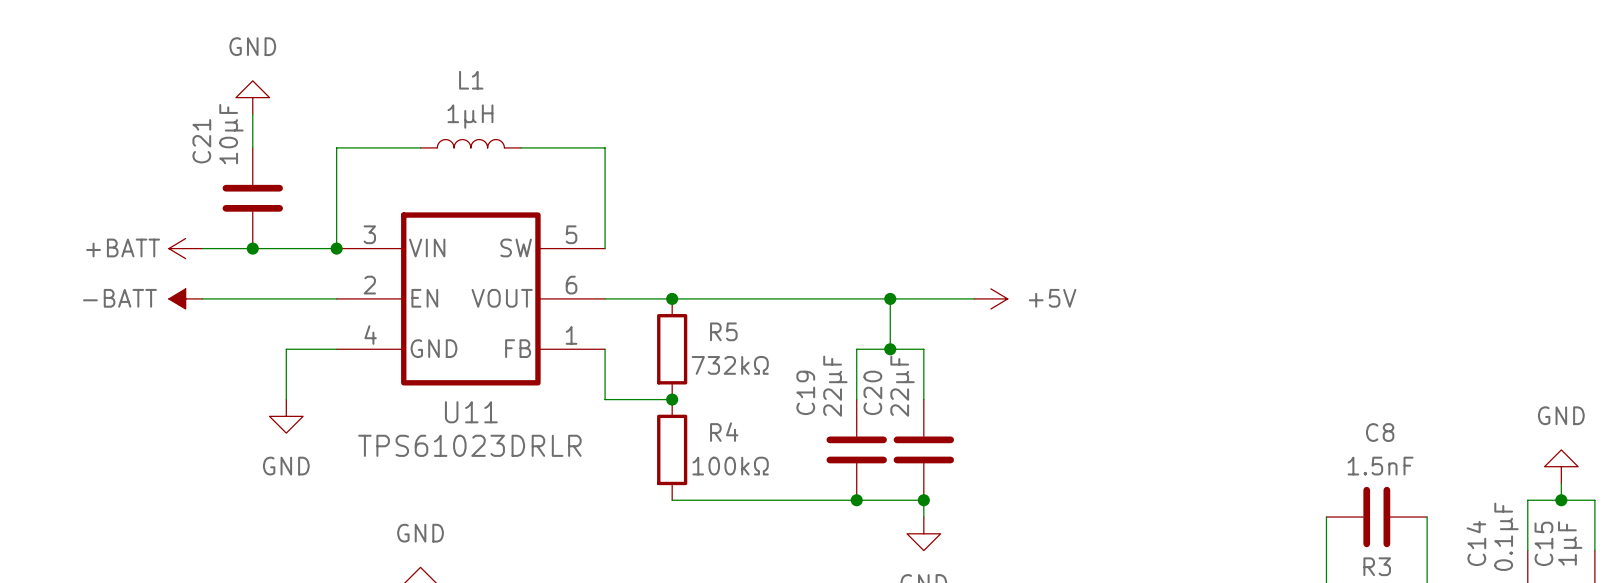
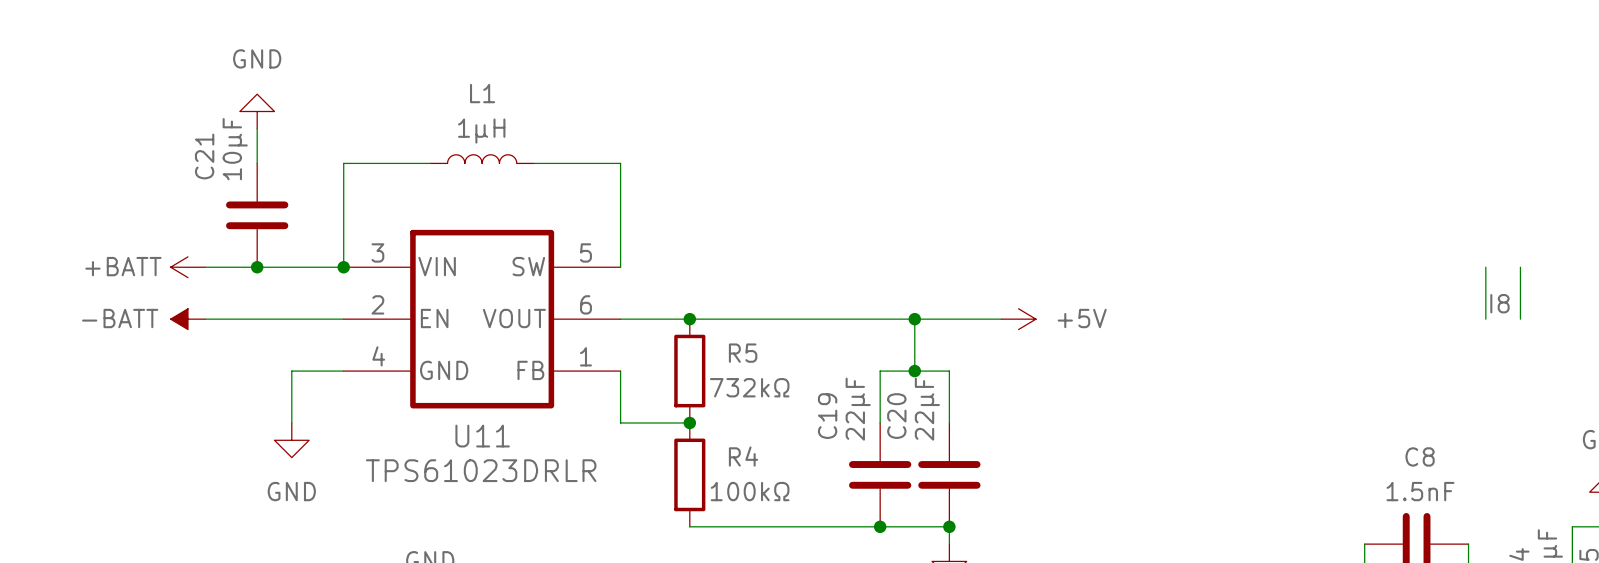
wire: none -> (1485, 267) (1485, 319)
wire: none -> (1520, 267) (1520, 319)
label: none -> I8 (1499, 303)

